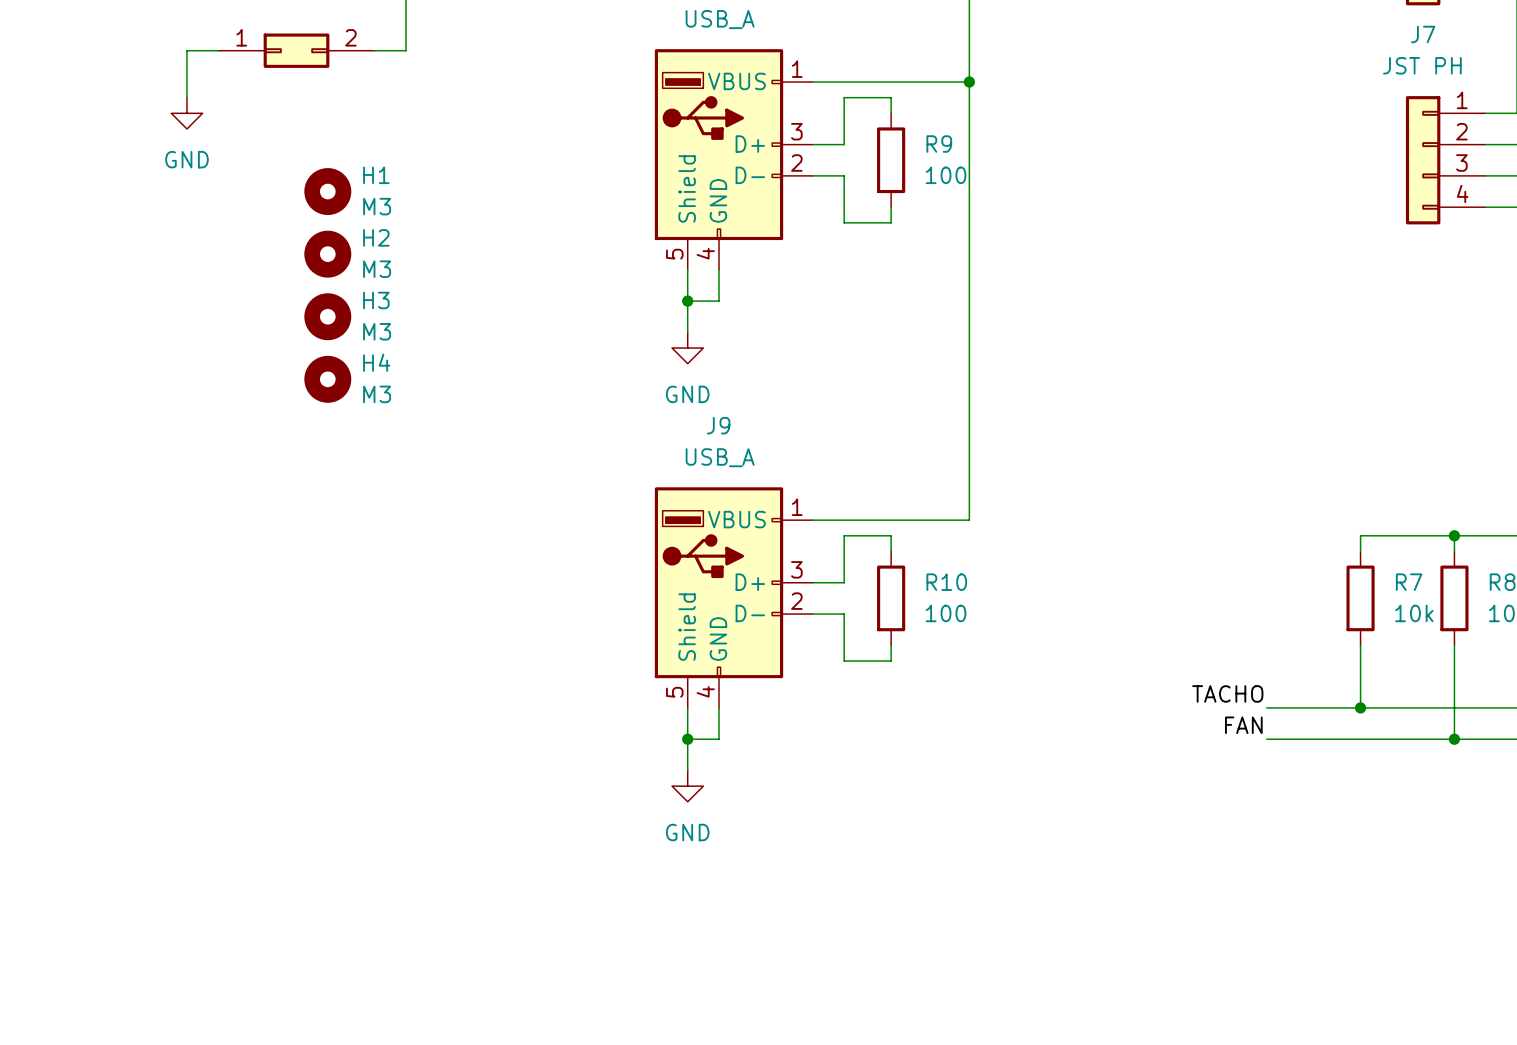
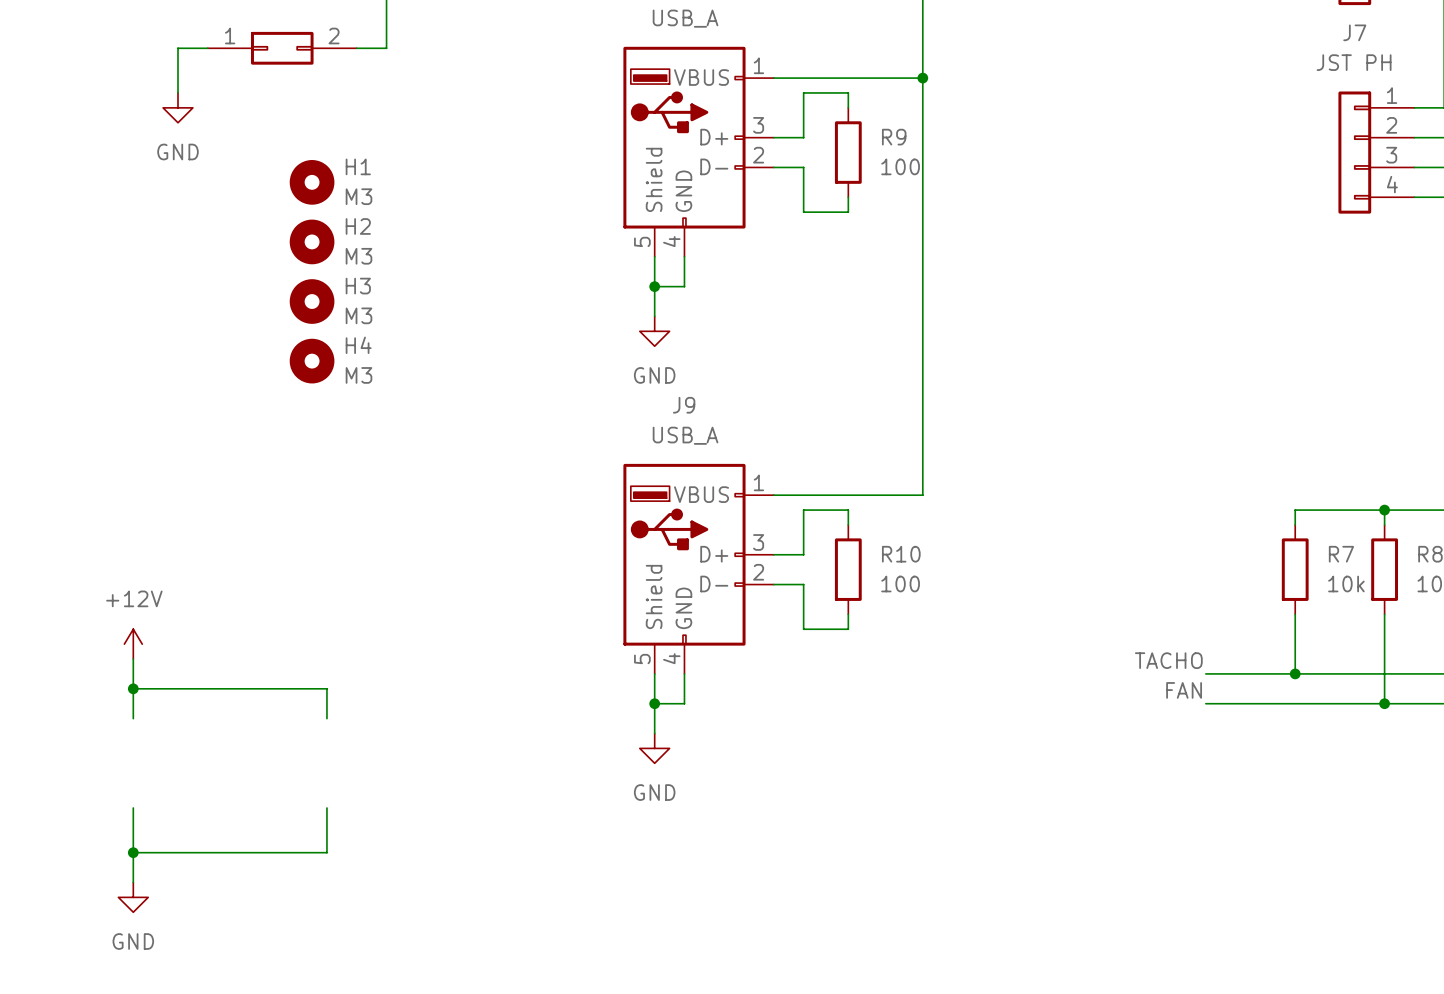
power symbol: none -> +12V (133, 644)
wire: none -> (133, 659) (133, 718)
wire: none -> (133, 688) (326, 688) (326, 718)
junction: none -> (133, 688)
wire: none -> (133, 807) (133, 882)
wire: none -> (326, 807) (326, 852) (133, 852)
junction: none -> (133, 852)
power symbol: none -> GND (133, 897)

